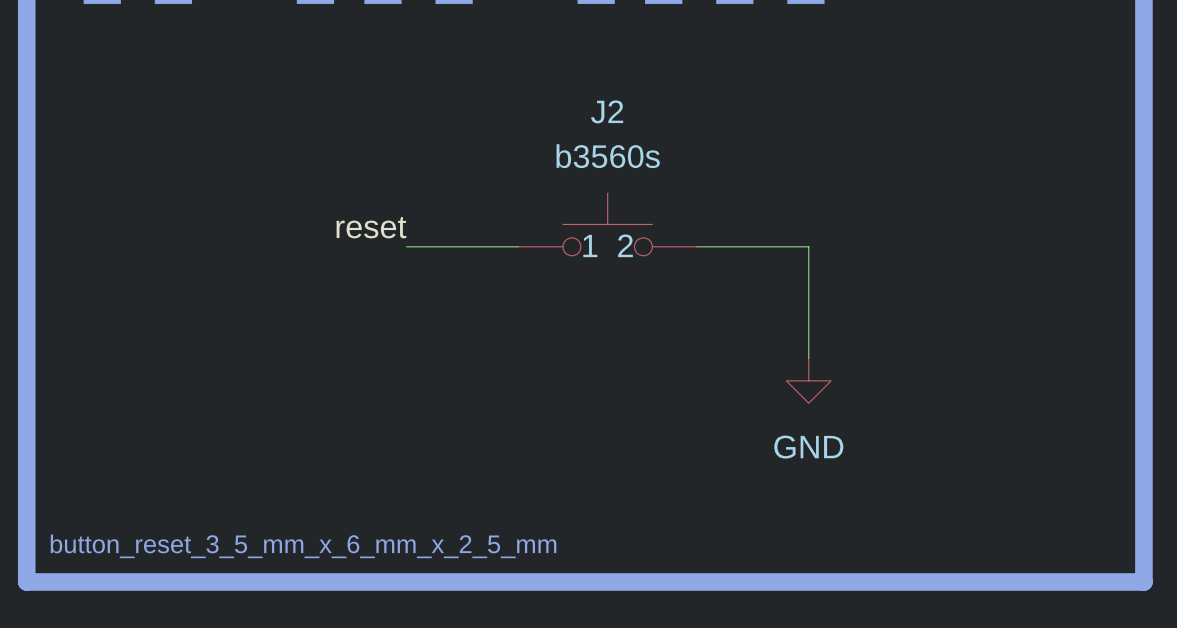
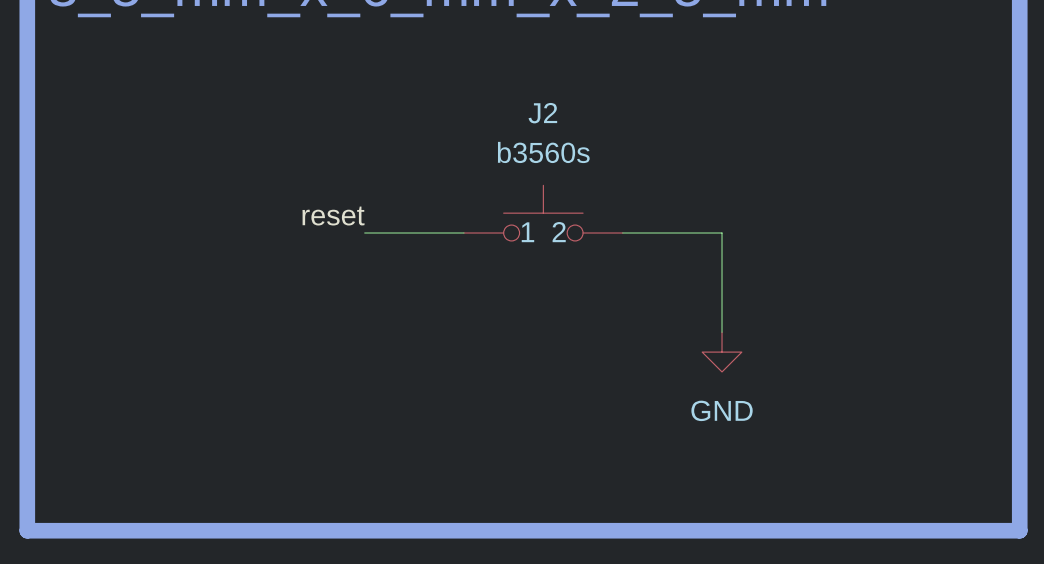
text: button_reset_3_5_mm_x_6_mm_x_2_5_mm (303, 546) -> none

